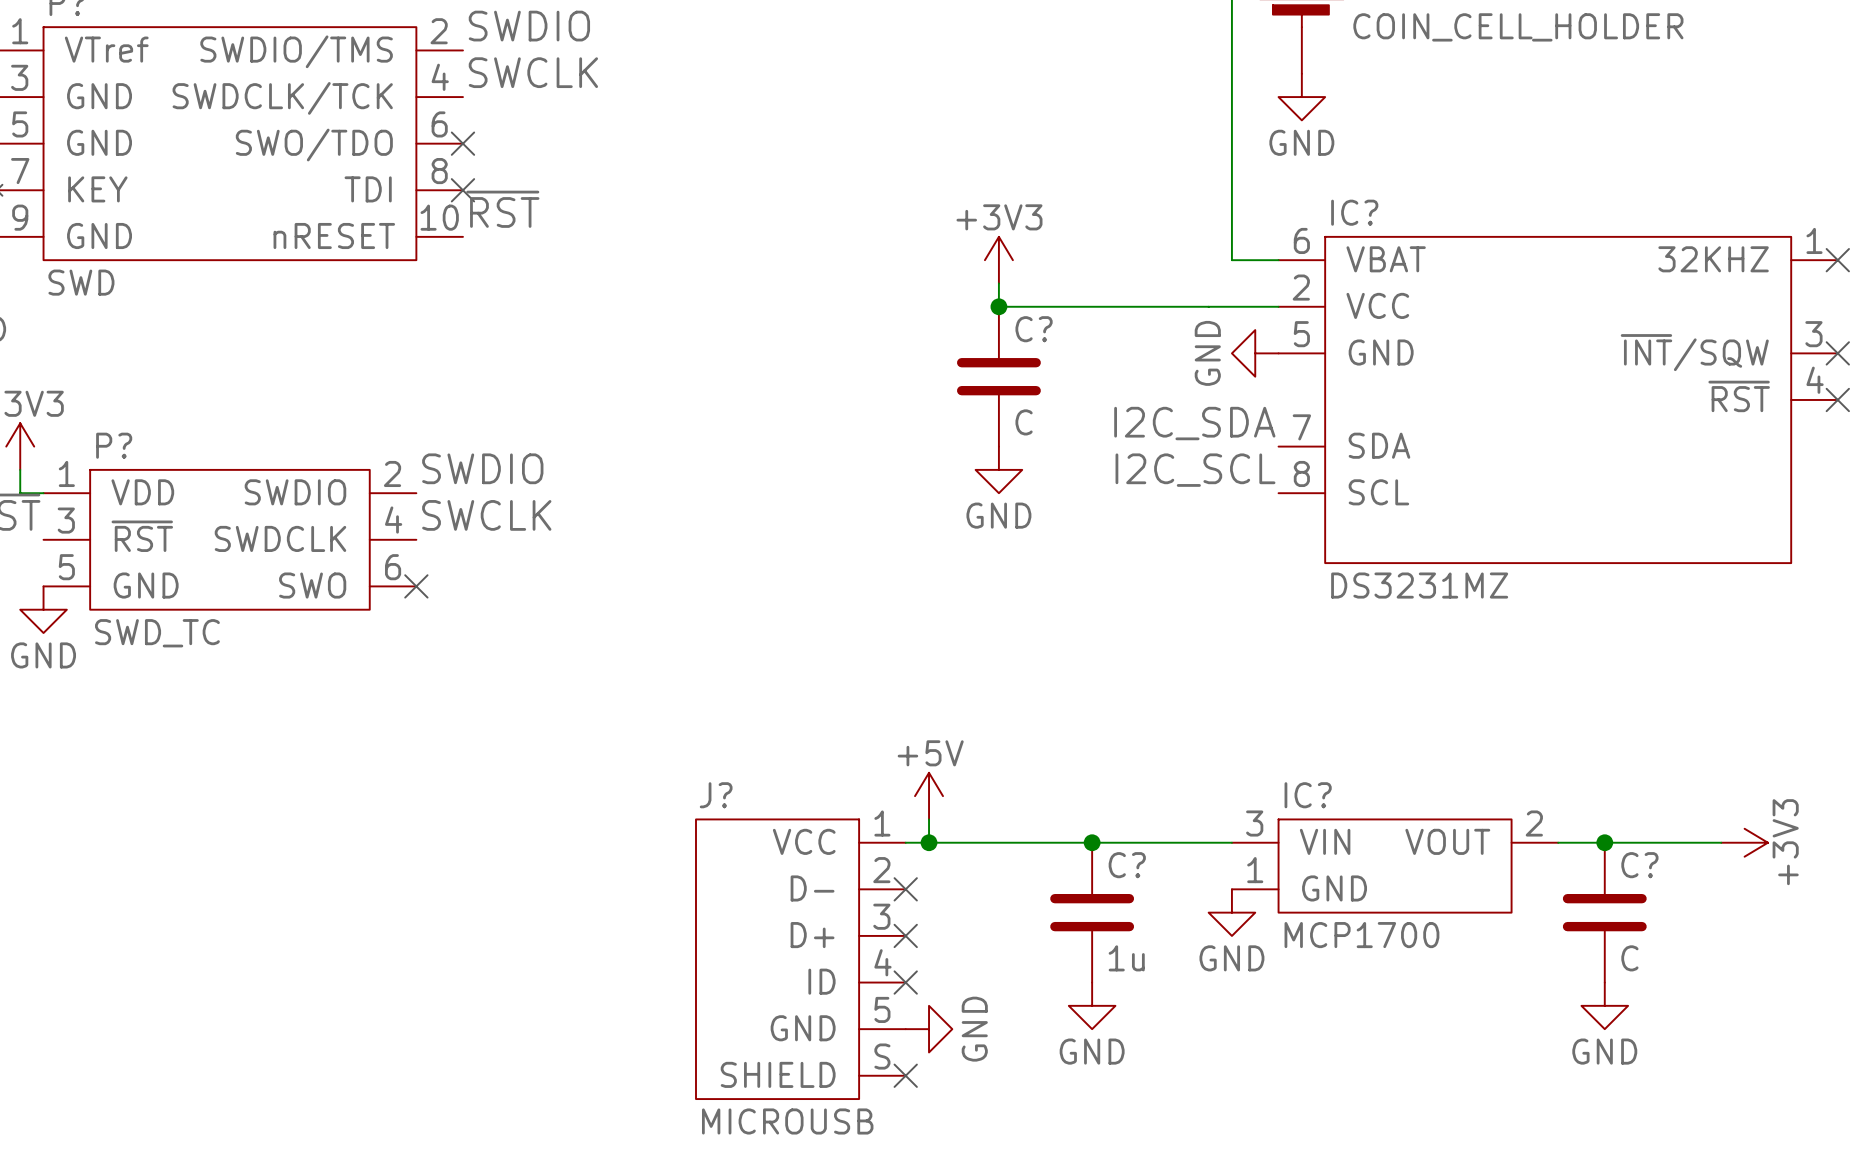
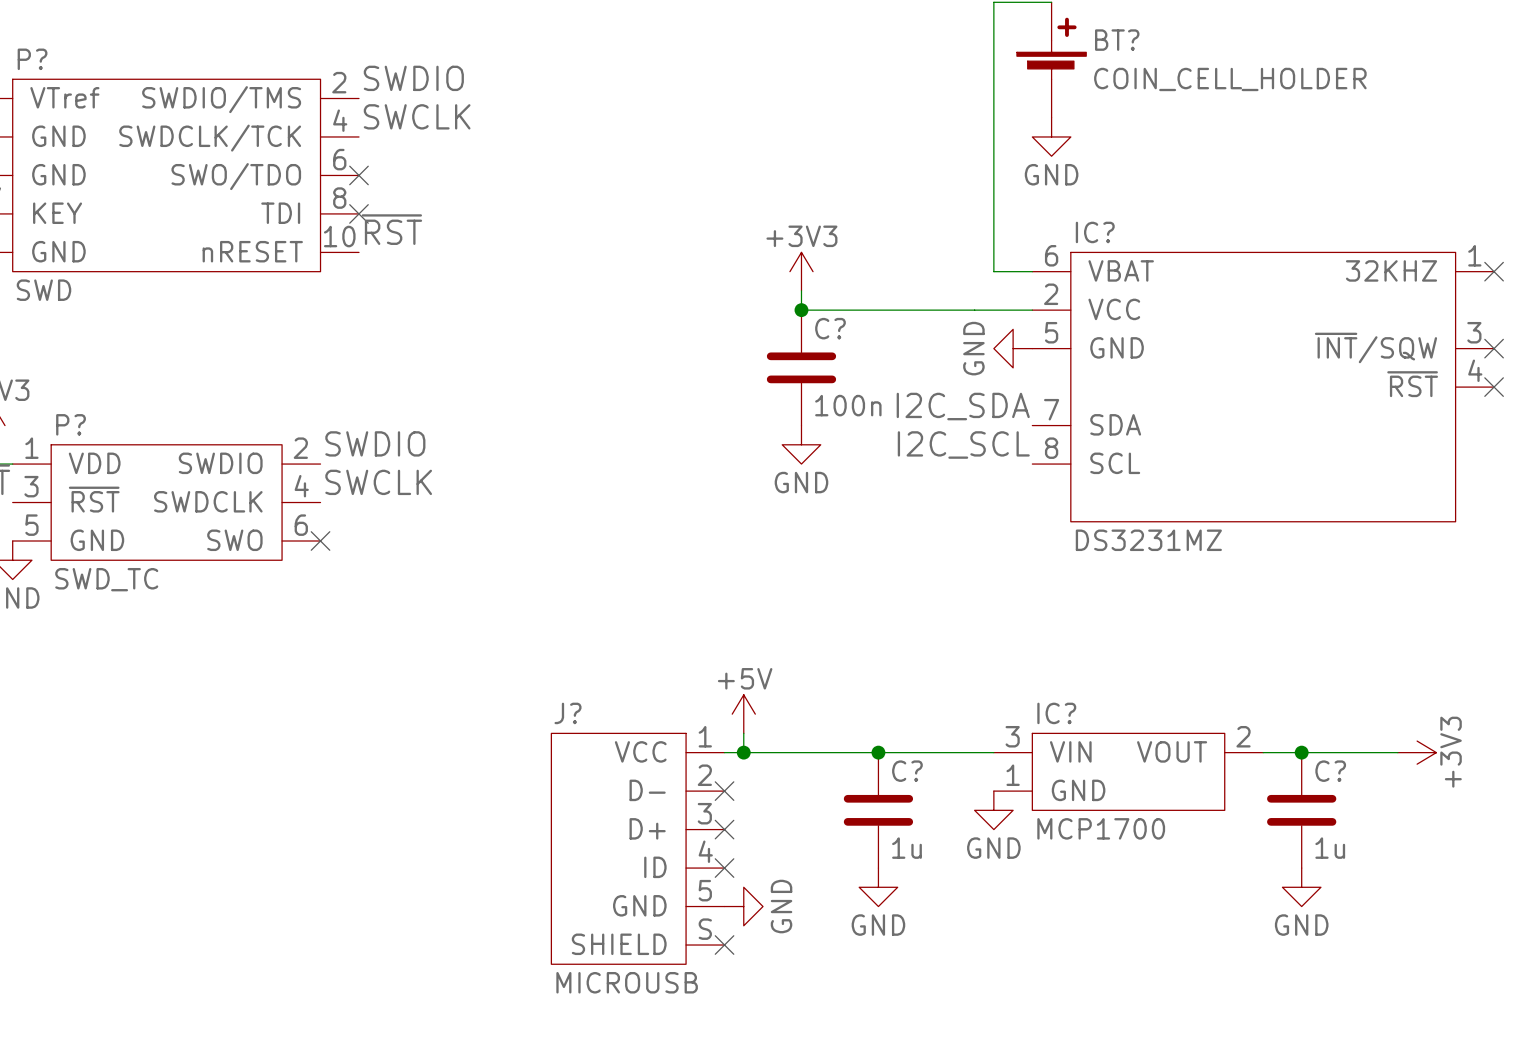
C? value: C (1024, 422) -> 100n (848, 405)
C? value: C (1629, 958) -> 1u (1330, 848)

